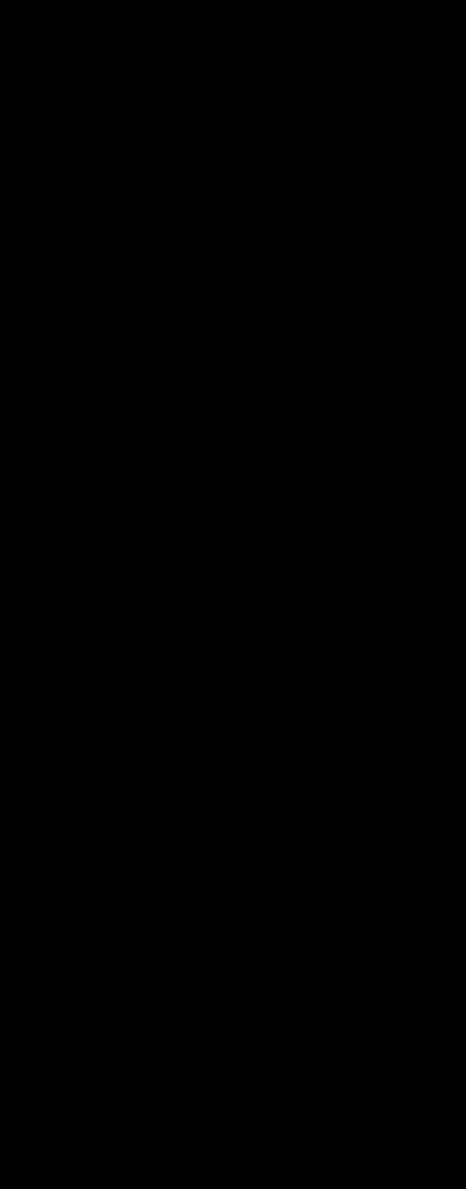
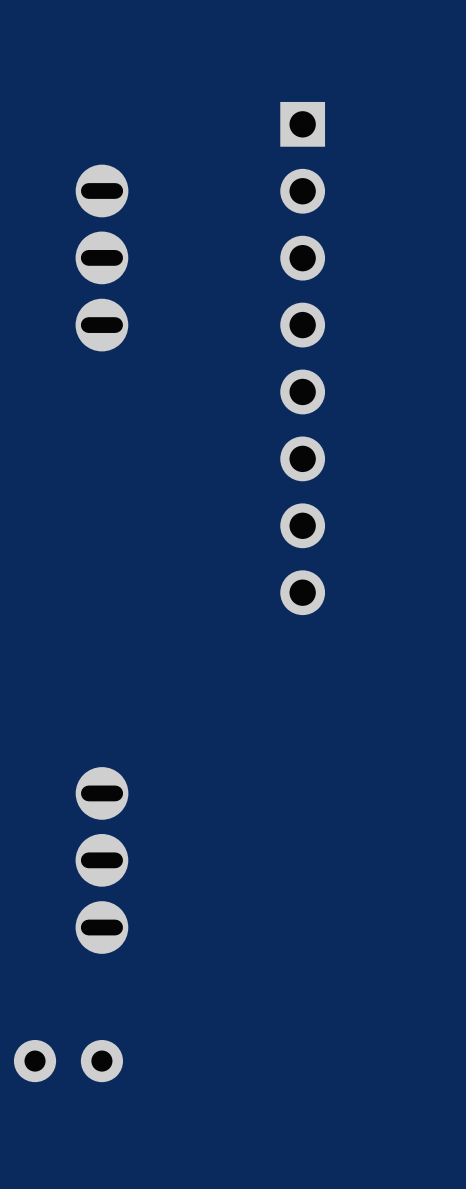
part: none -> (101, 258)
part: none -> (302, 358)
part: none -> (101, 860)
part: none -> (68, 1061)

